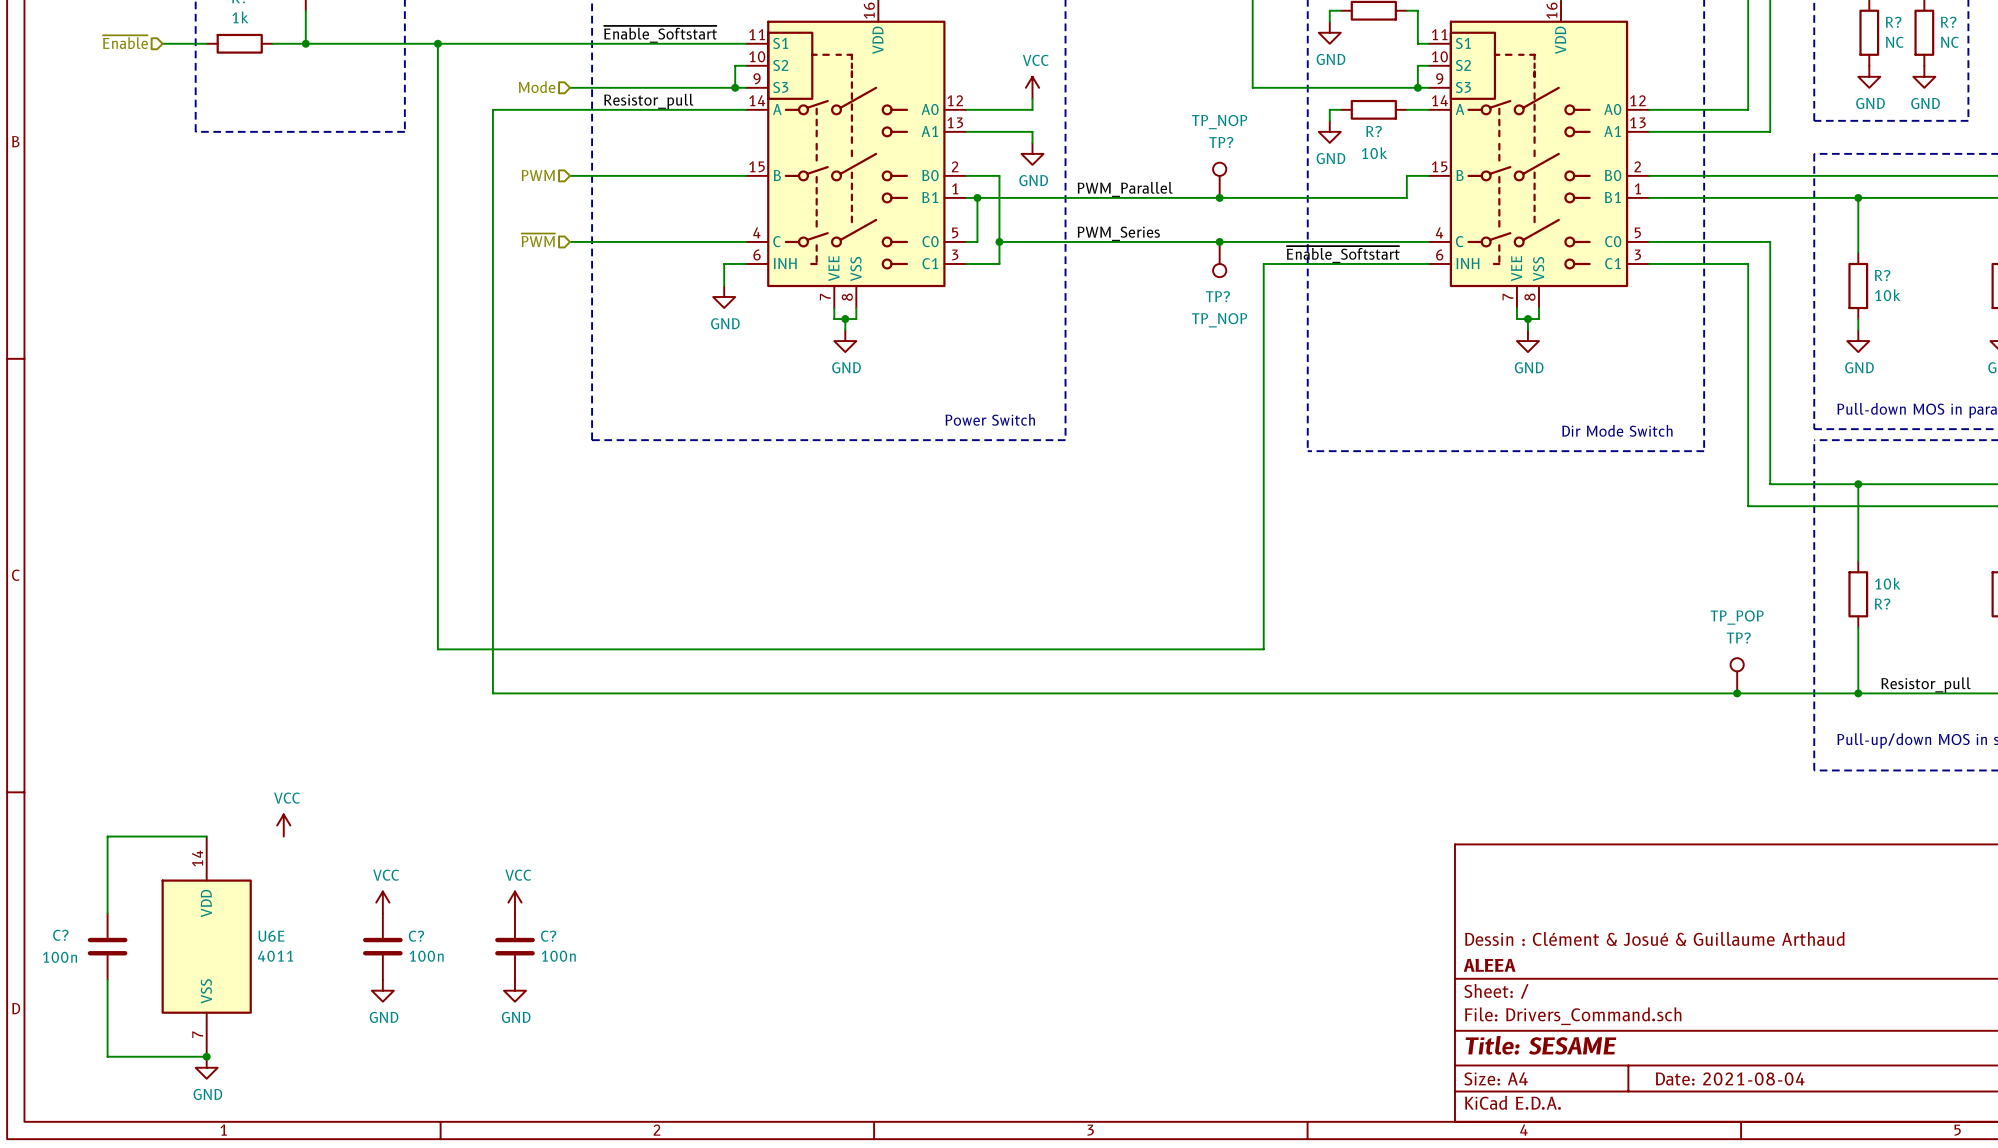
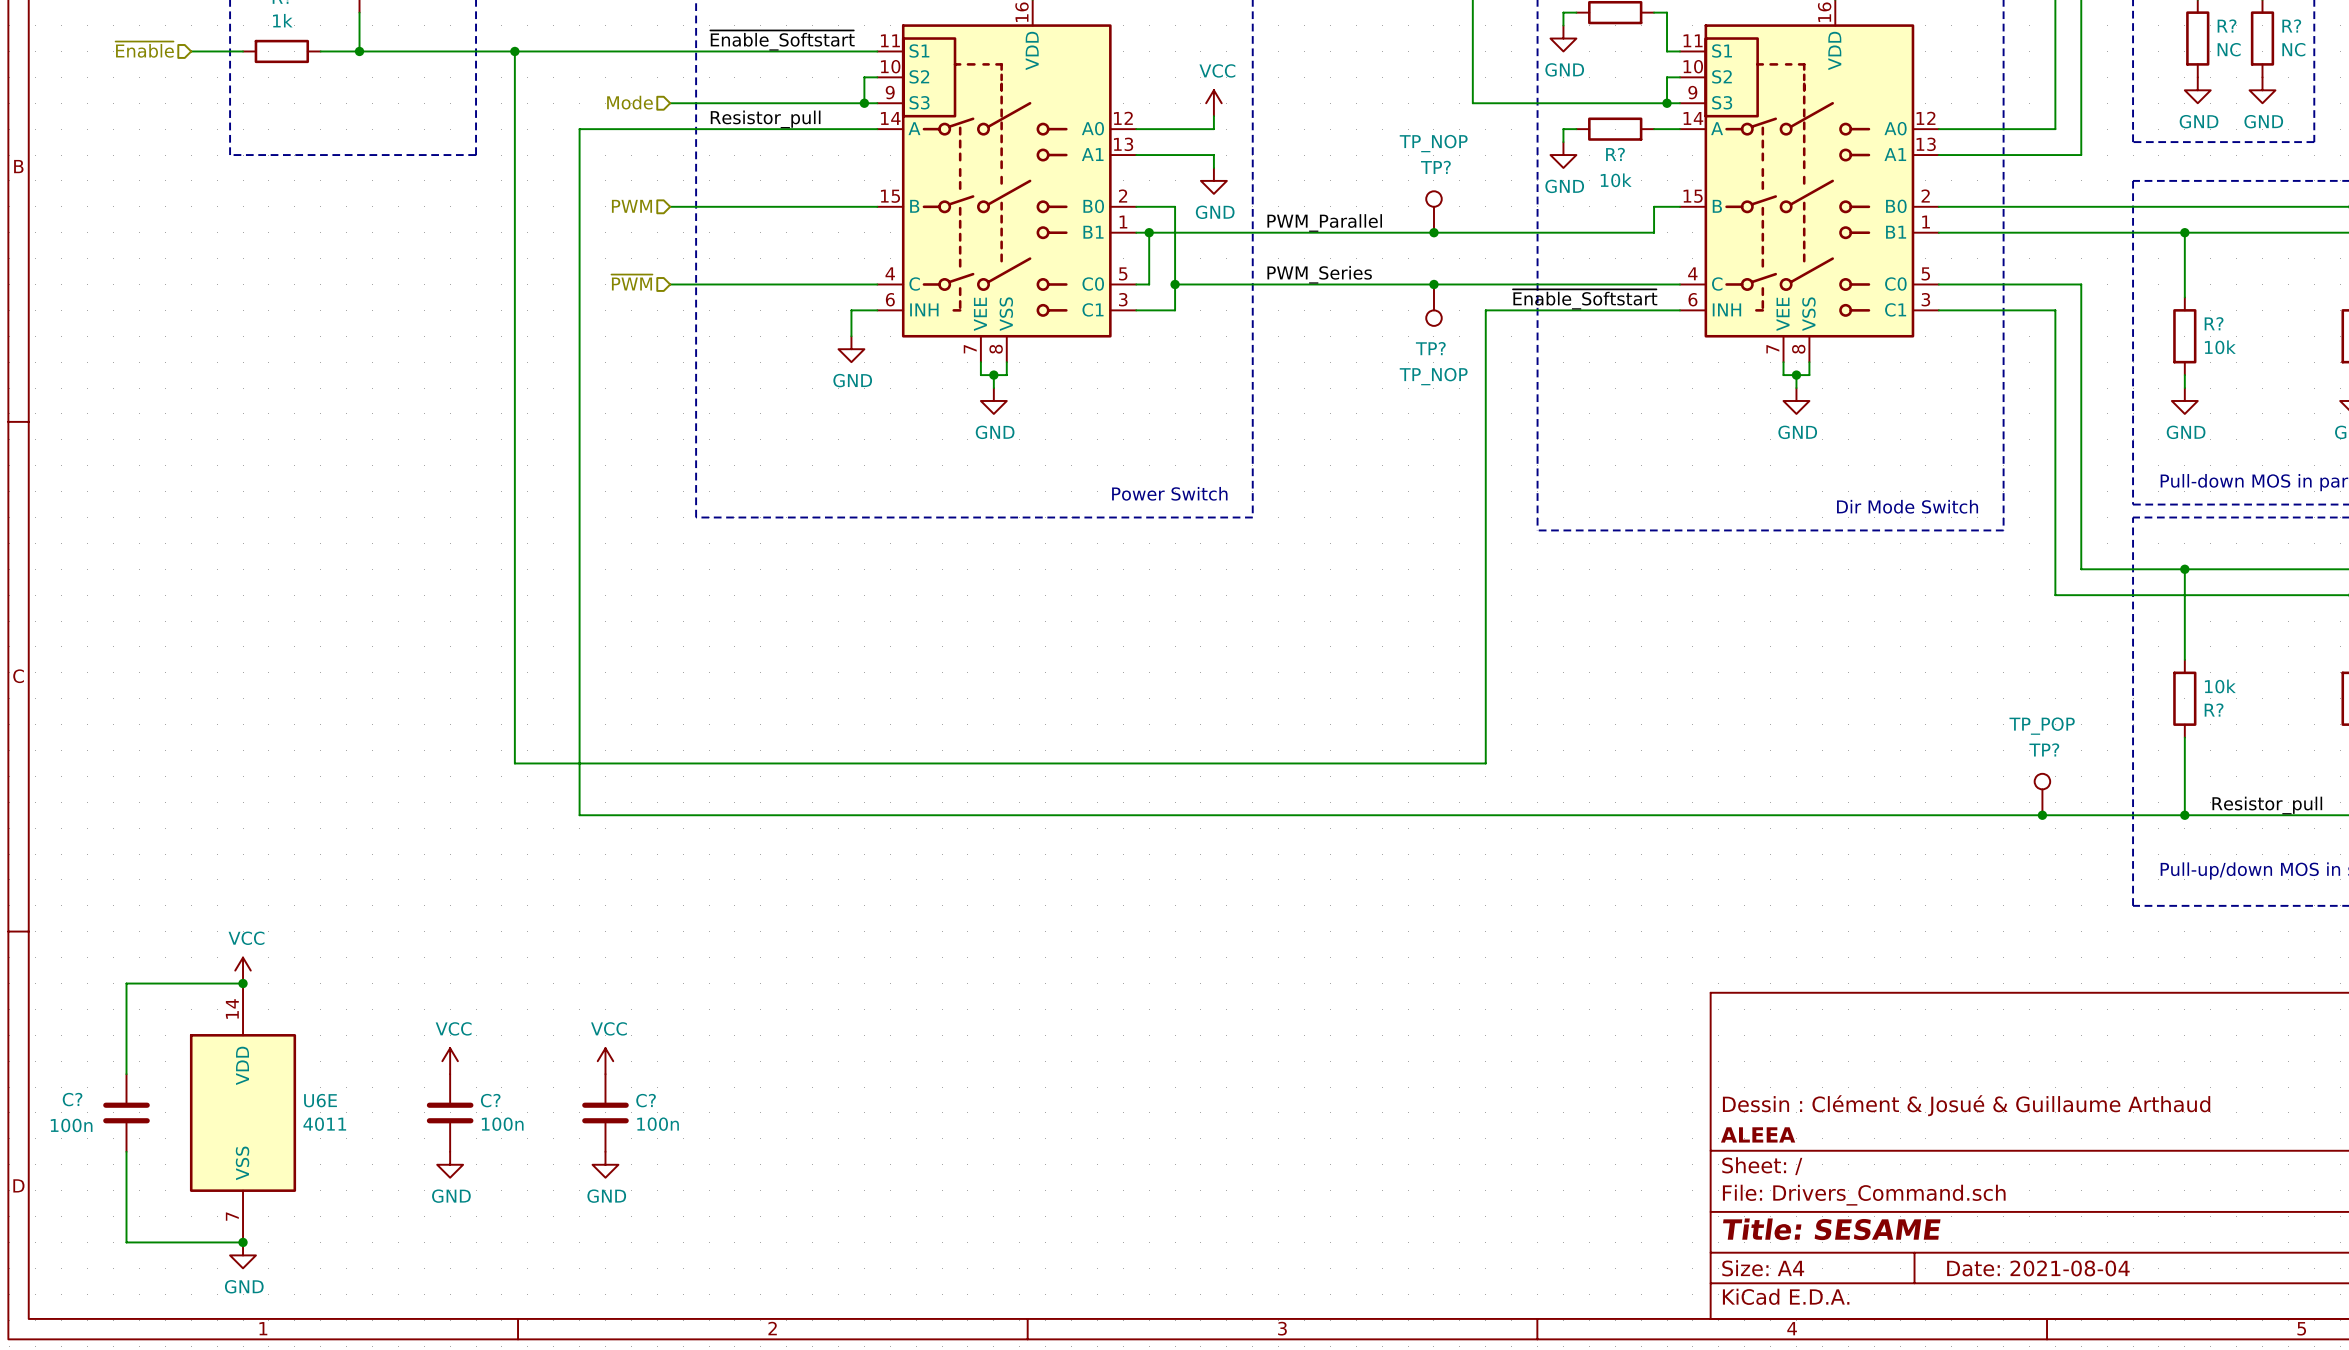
power symbol position: VCC (283, 825) -> VCC (243, 970)
junction: none -> (243, 983)

